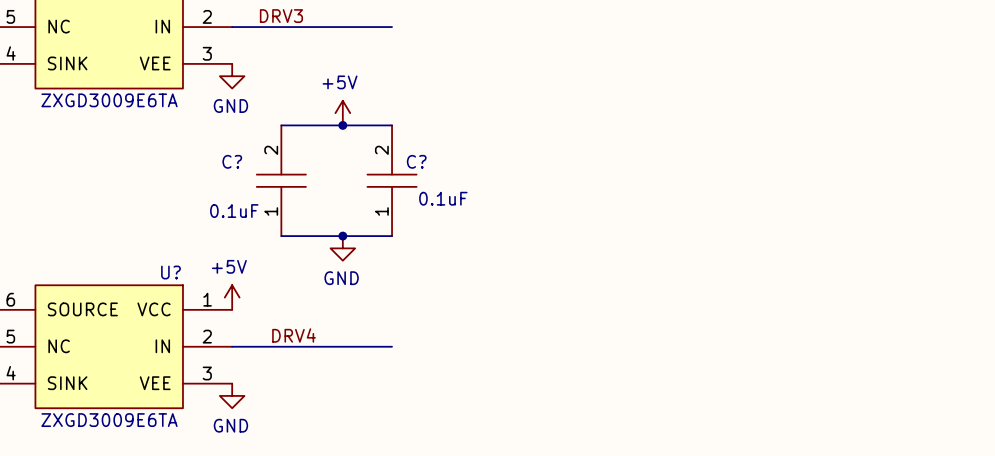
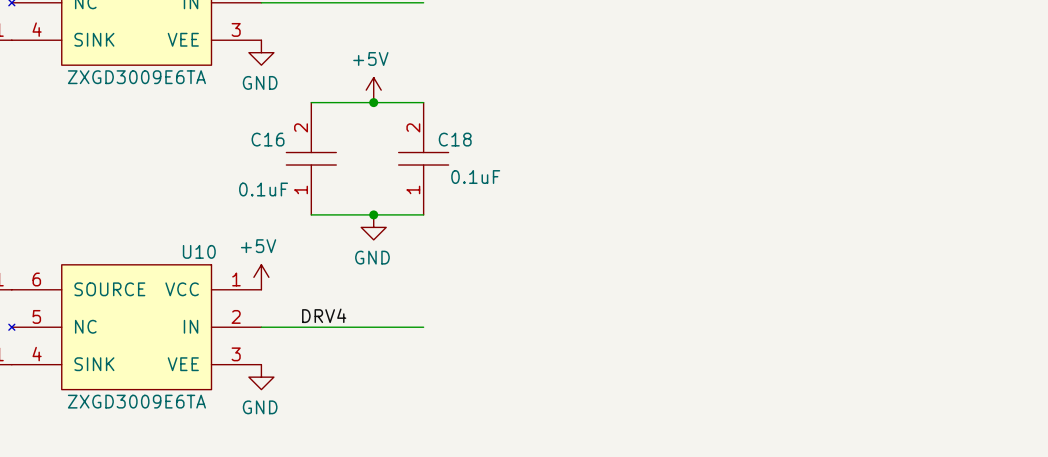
C? name: C? (232, 161) -> C16 (268, 139)
C? name: C? (416, 161) -> C18 (455, 139)
U? name: U? (170, 272) -> U10 (199, 251)

